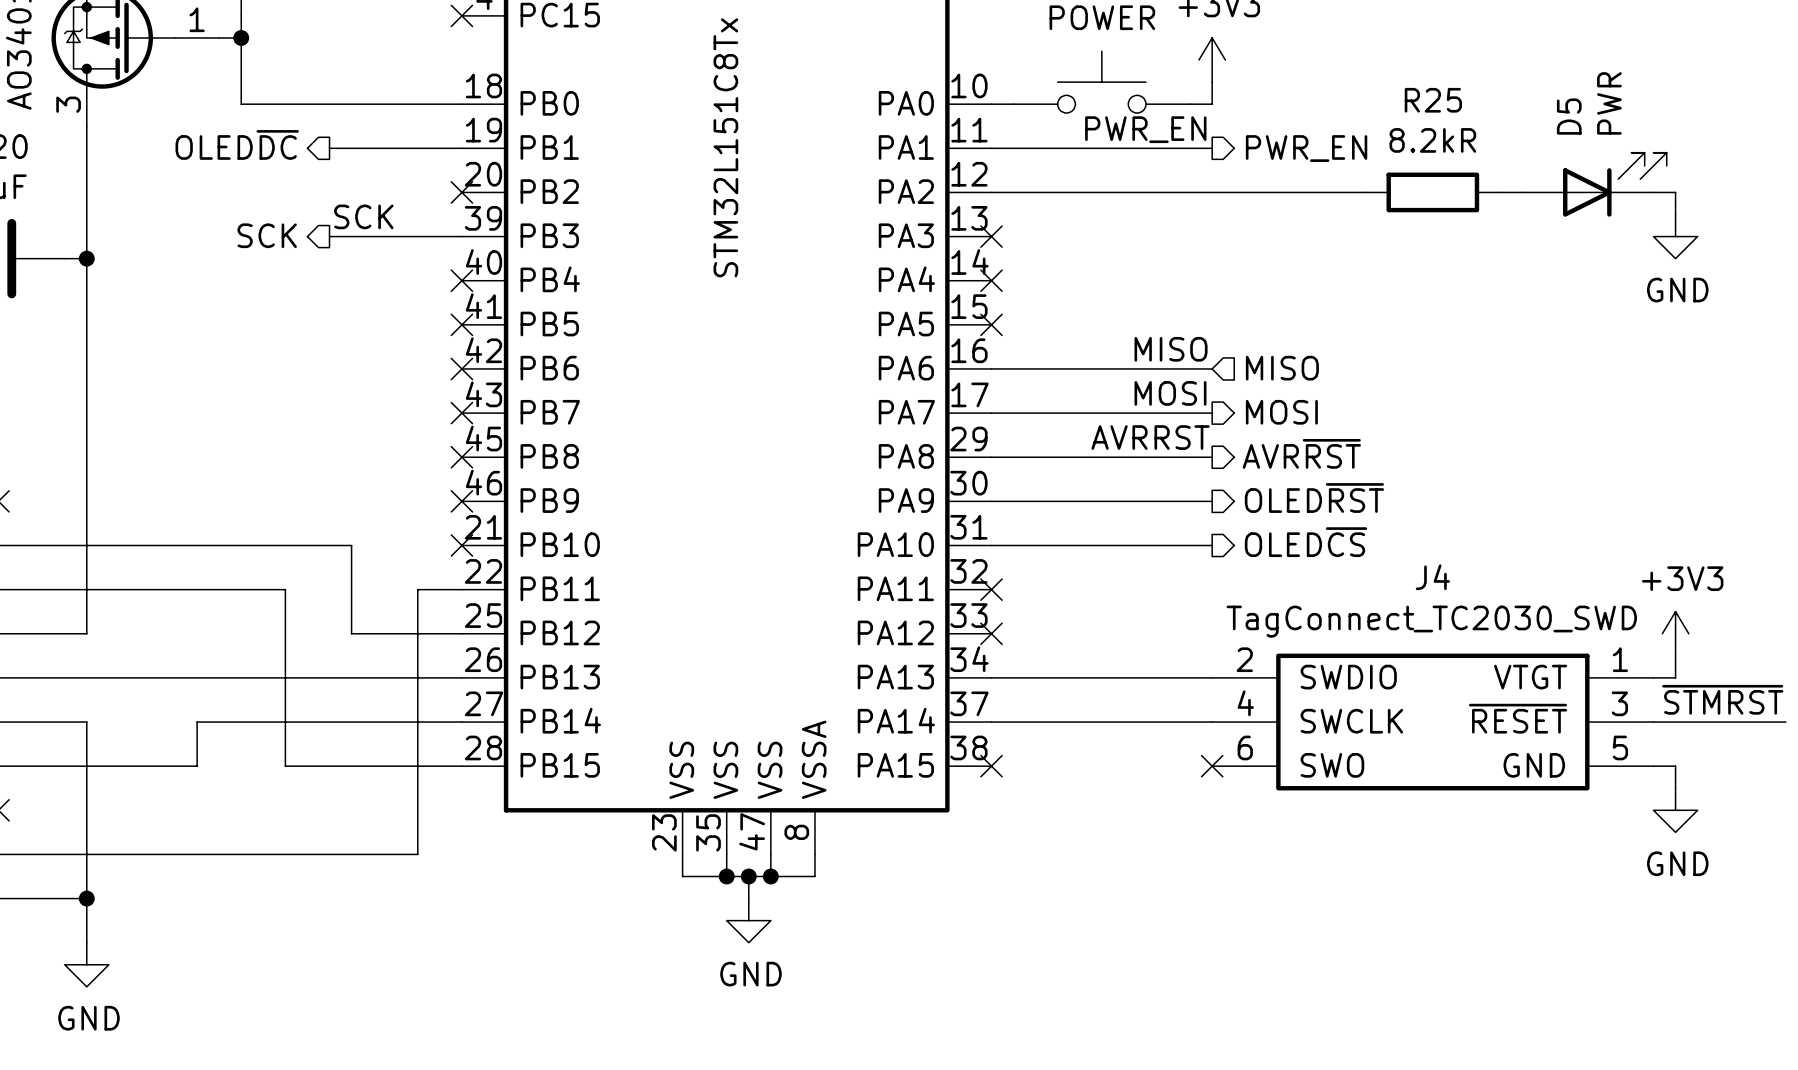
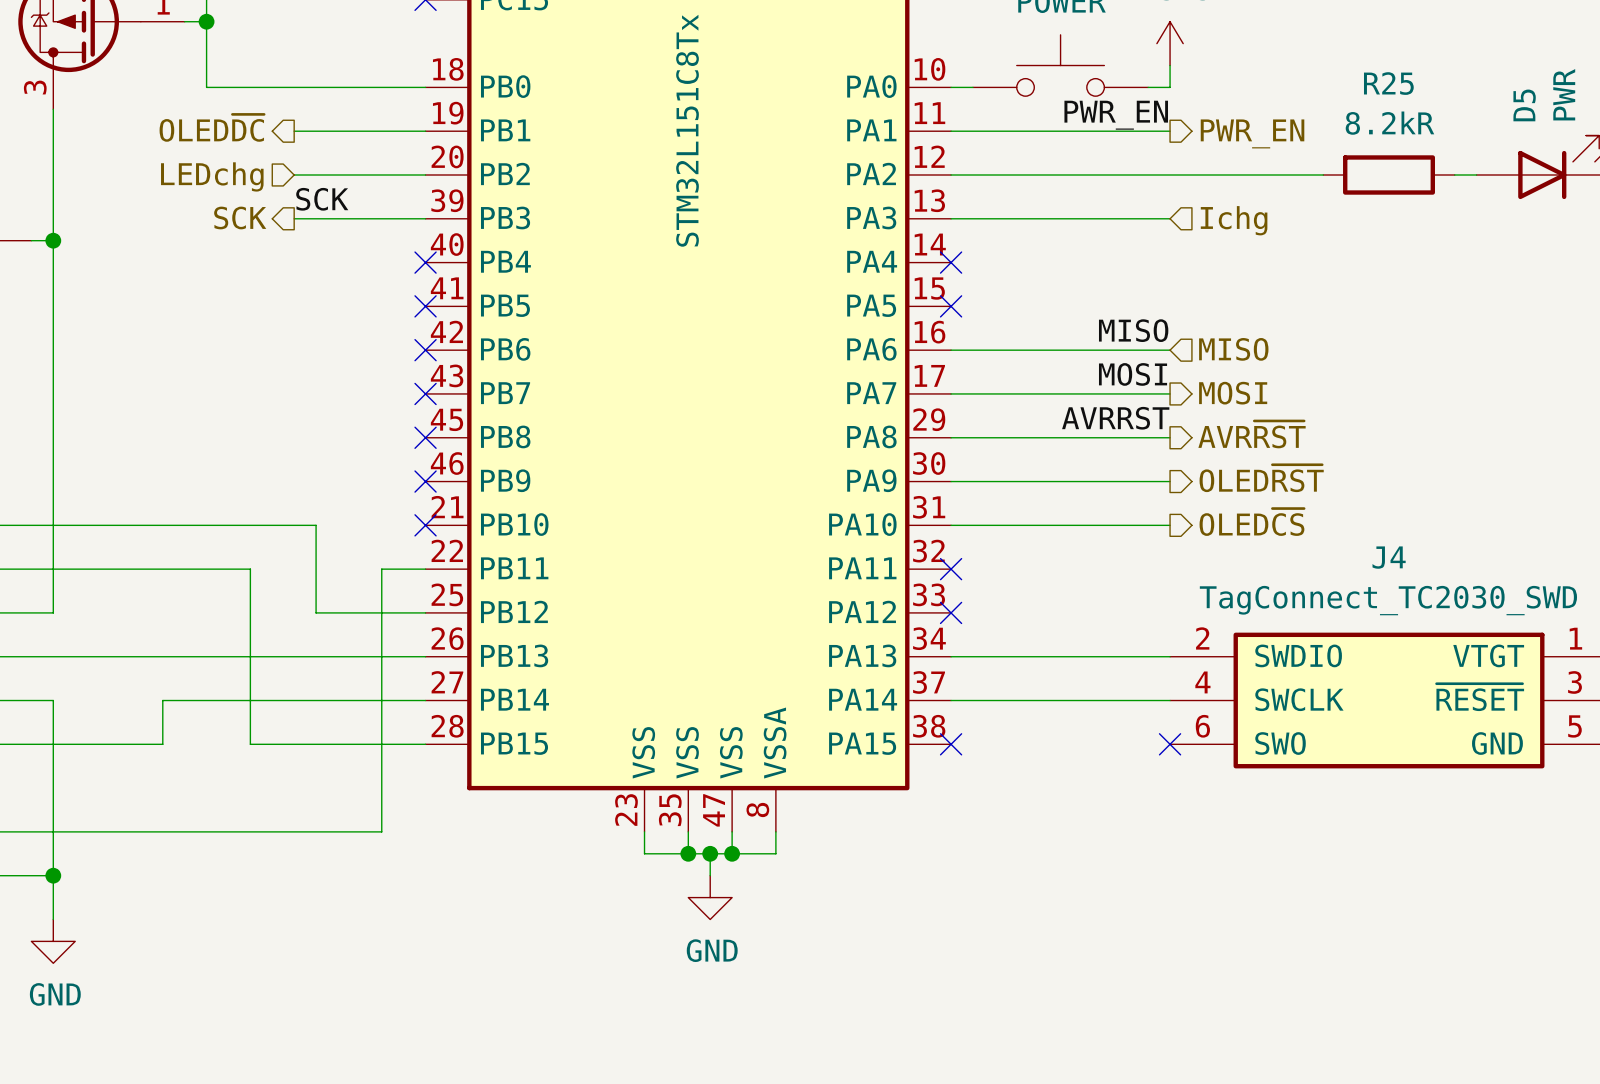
wire: none -> (294, 174) (425, 174)
no-connect mark: (461, 192) -> none
hierarchical label: none -> LEDchg (212, 176)
wire: none -> (951, 218) (1170, 218)
no-connect mark: (991, 236) -> none
hierarchical label: none -> Ichg (1234, 220)

